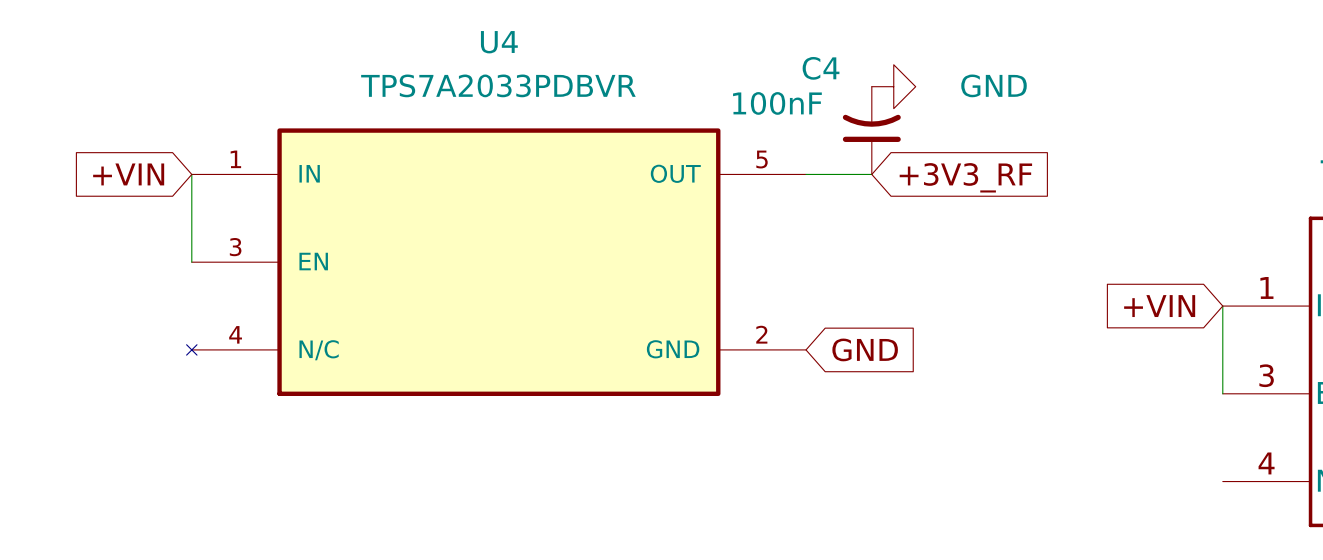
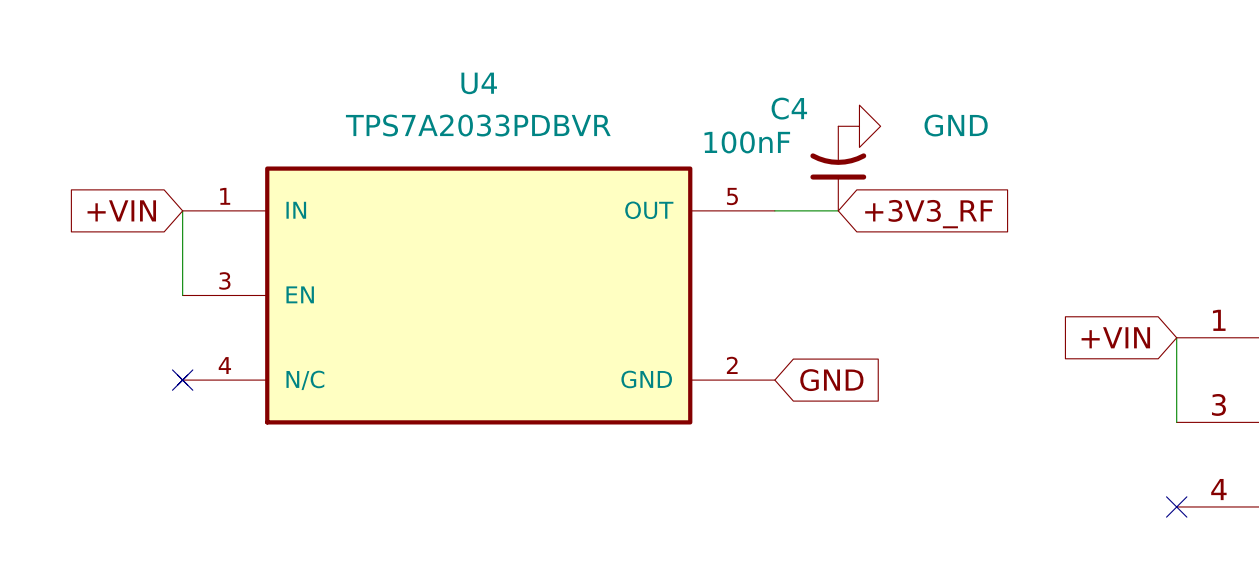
no-connect mark: none -> (182, 380)
no-connect mark: none -> (1176, 506)

